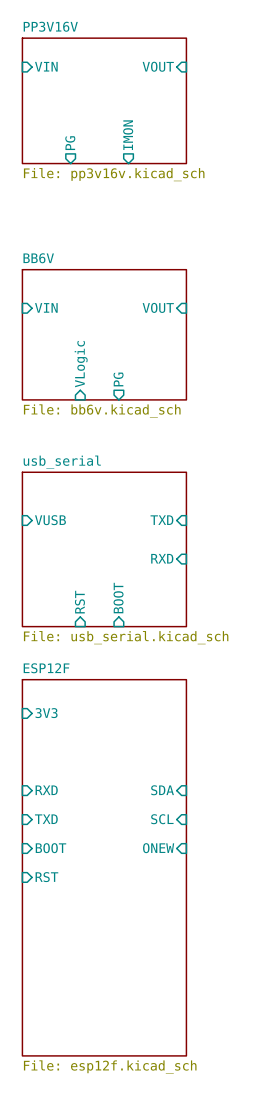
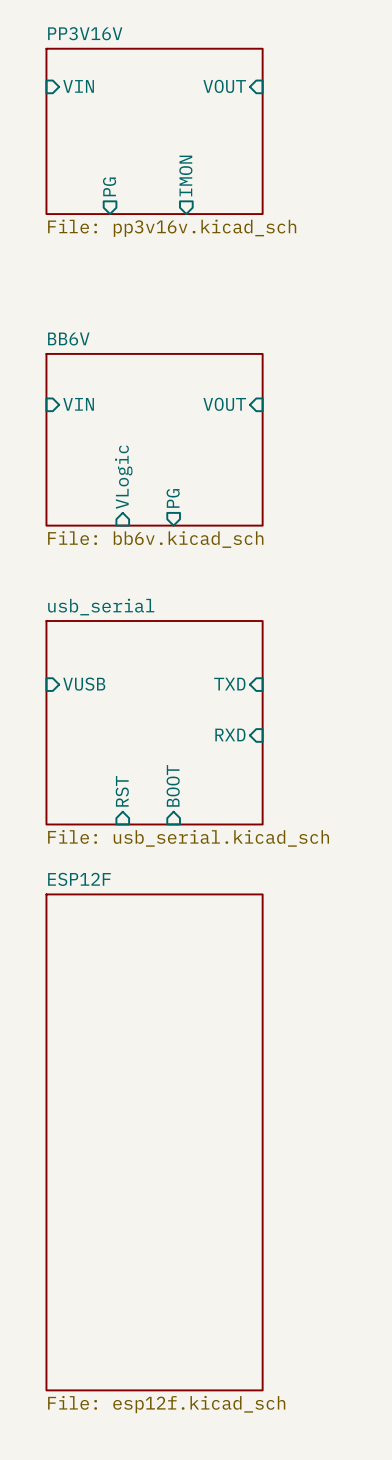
sheet pin: 3V3 (46, 713) -> none
sheet pin: RXD (46, 790) -> none
sheet pin: SDA (162, 790) -> none
sheet pin: TXD (46, 819) -> none
sheet pin: SCL (162, 819) -> none
sheet pin: BOOT (50, 848) -> none
sheet pin: ONEW (158, 848) -> none
sheet pin: RST (46, 877) -> none

